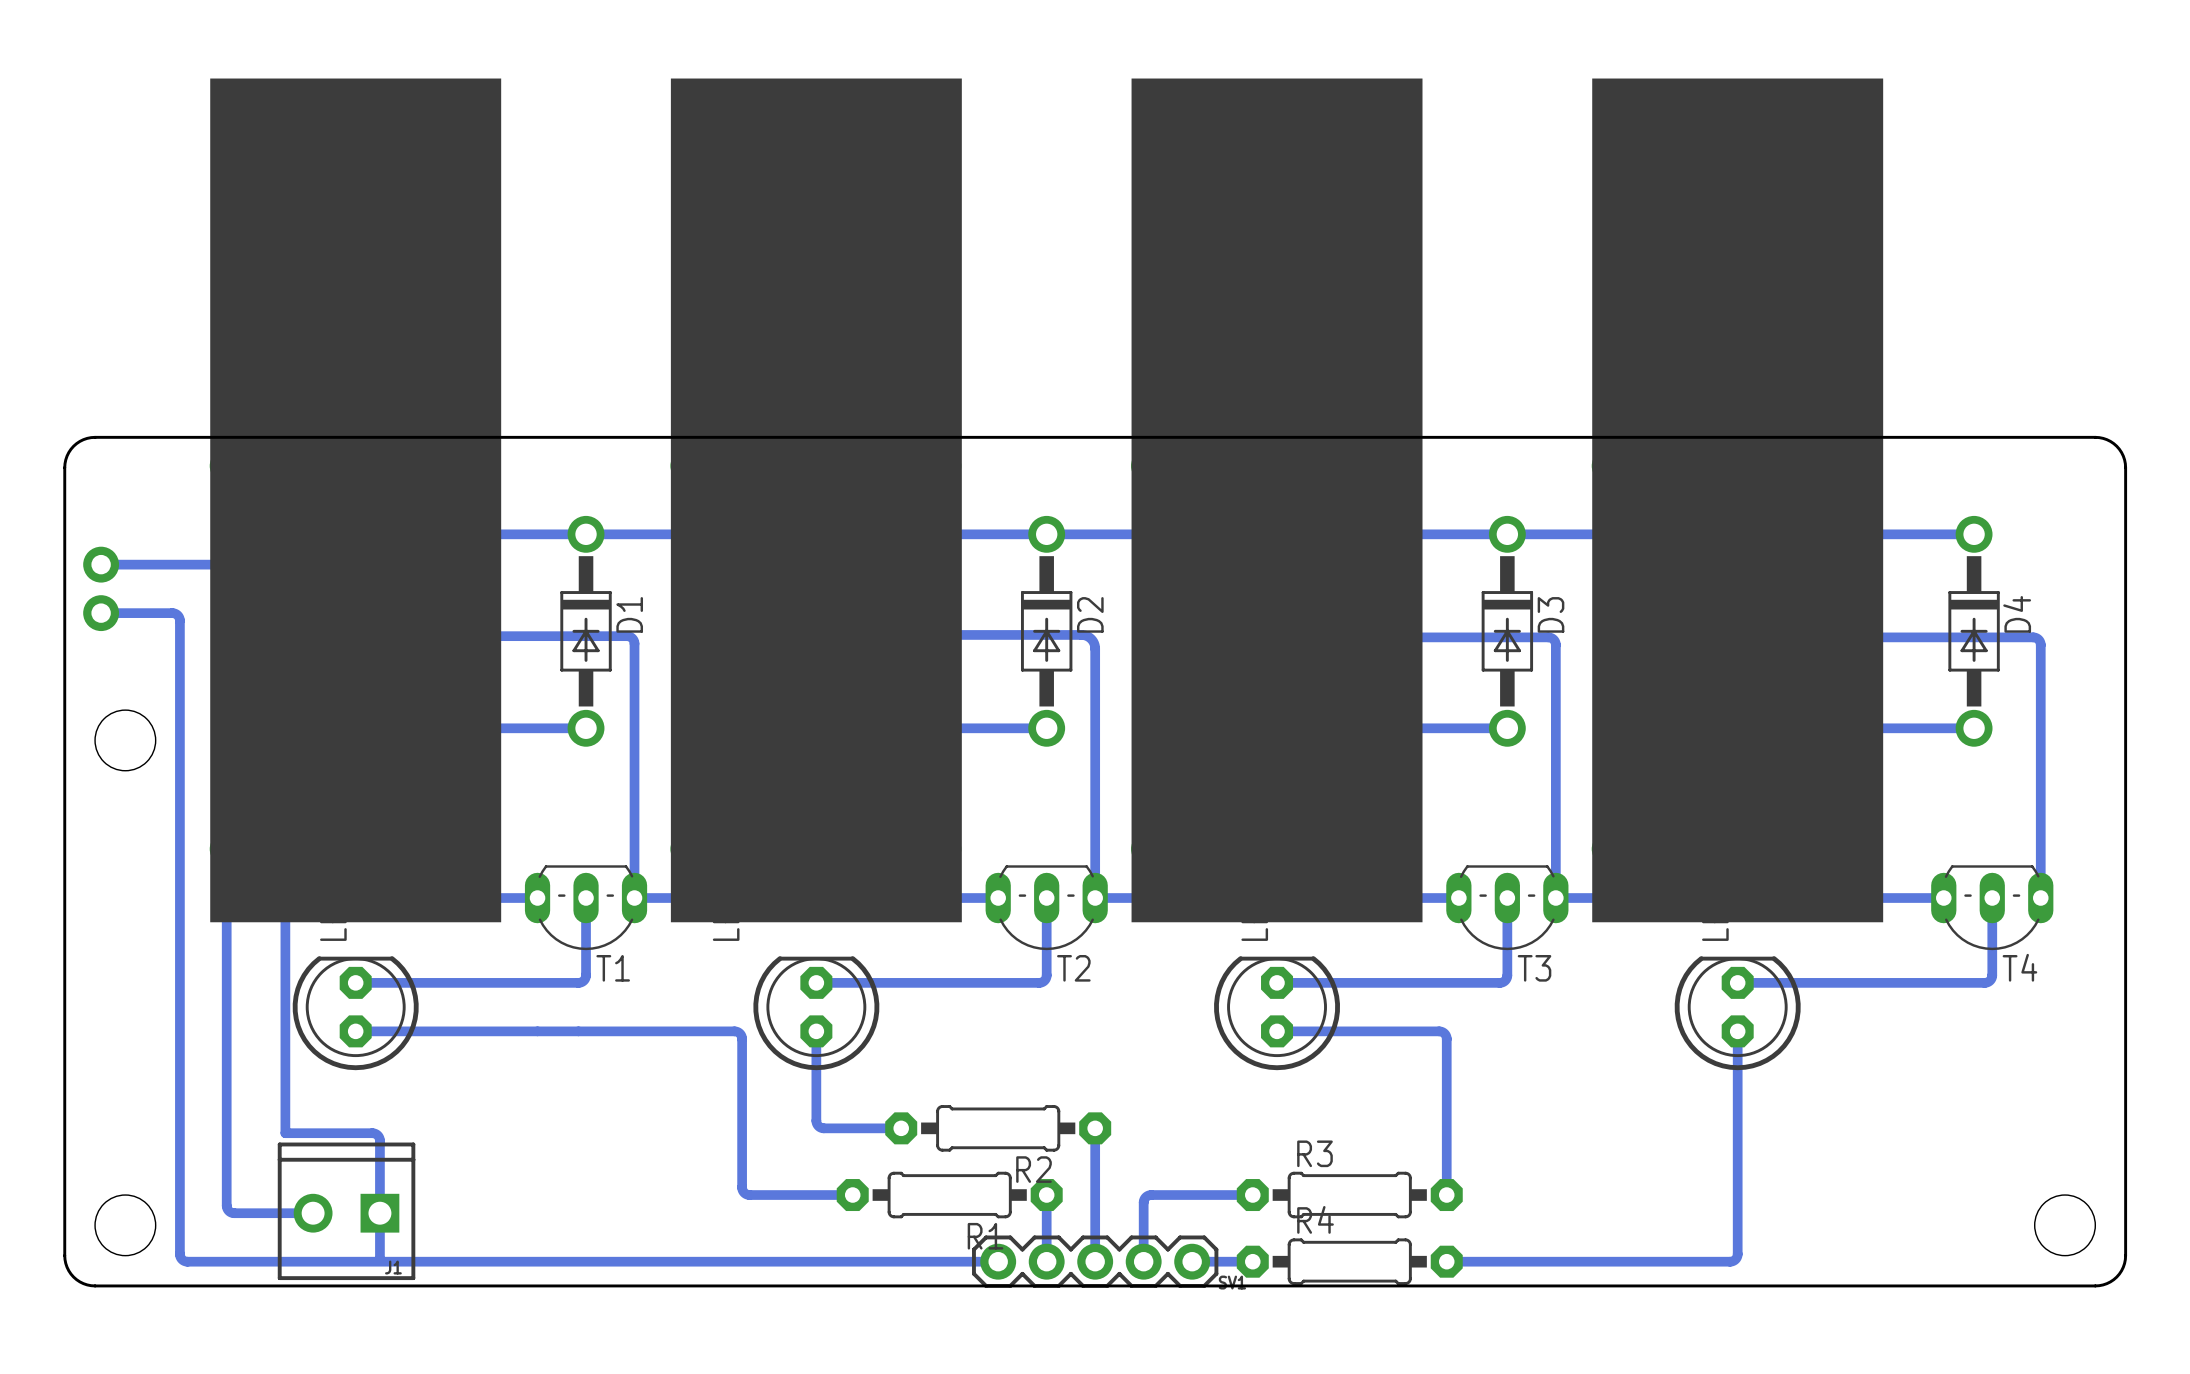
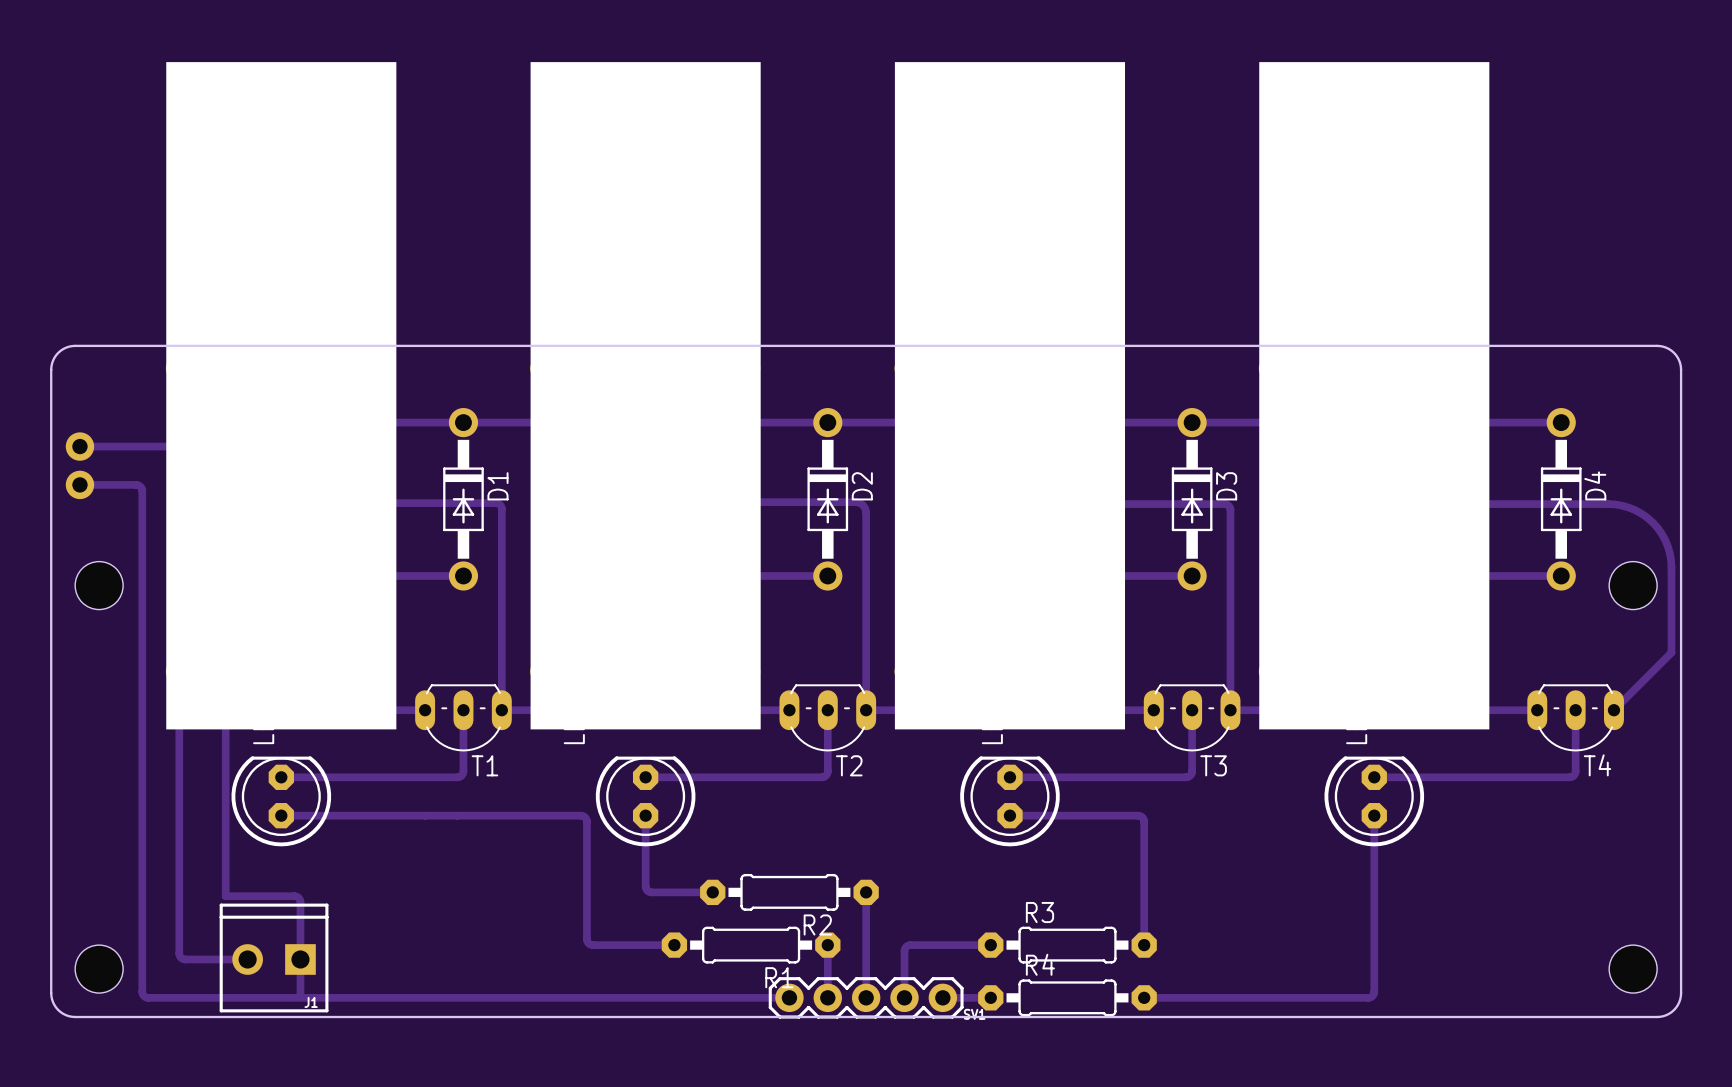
track: (2033, 637) (2038, 639) (2040, 644) (2040, 898) -> (1607, 504) (1622, 505) (1635, 510) (1652, 522) (1661, 533) (1667, 546) (1671, 567) (1671, 652) (1613, 710)
hole: none -> (1633, 585)

